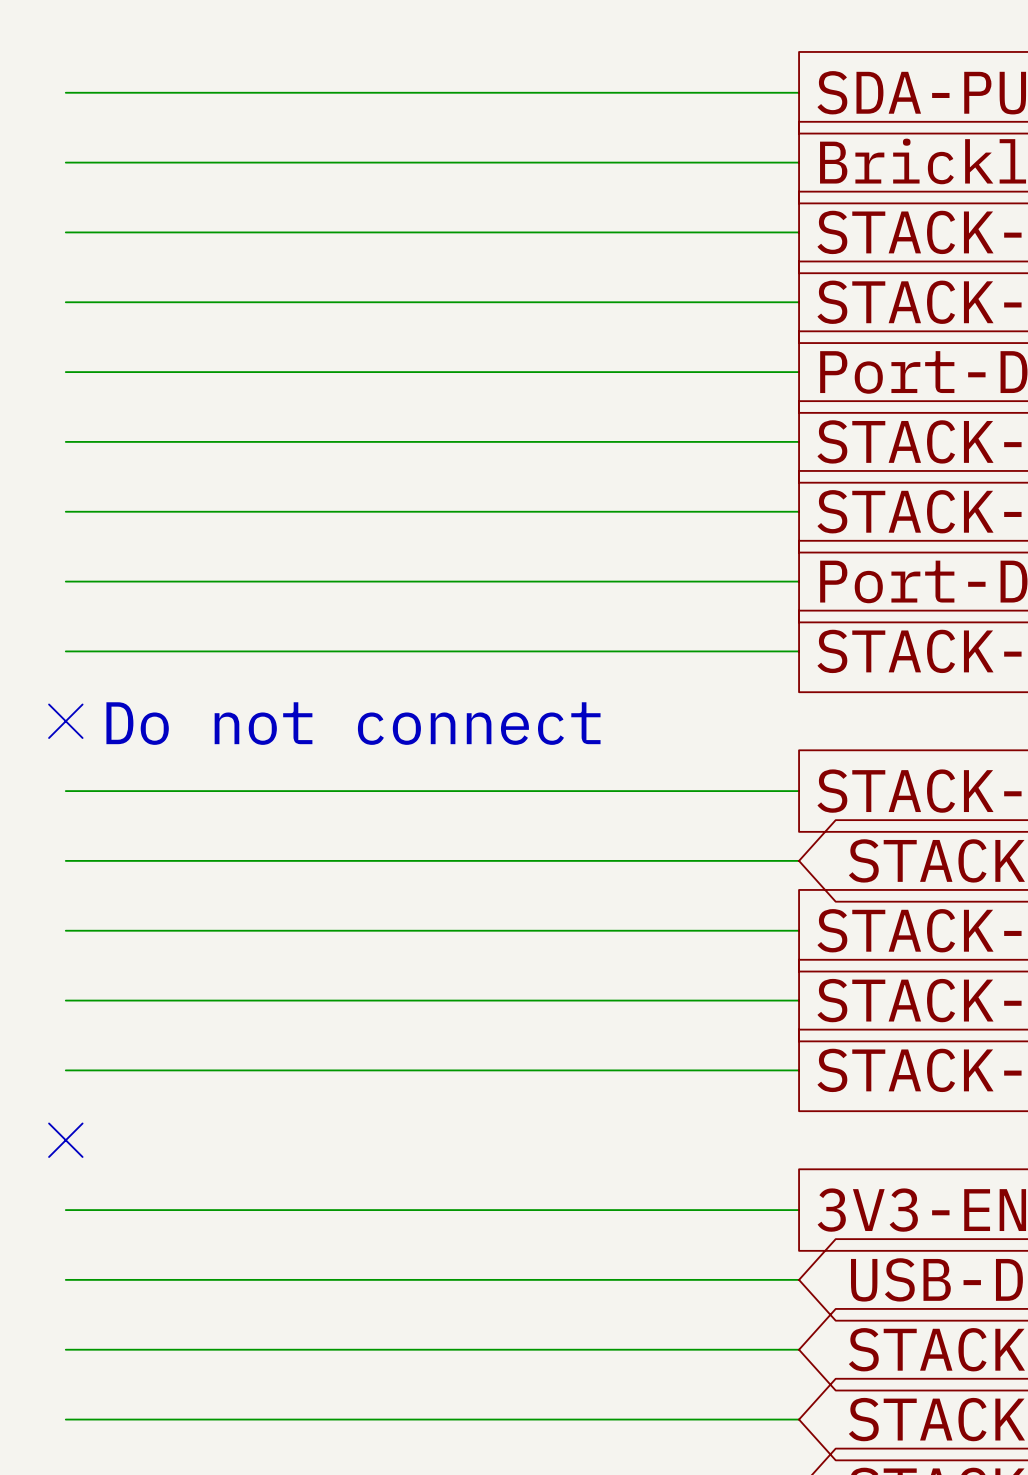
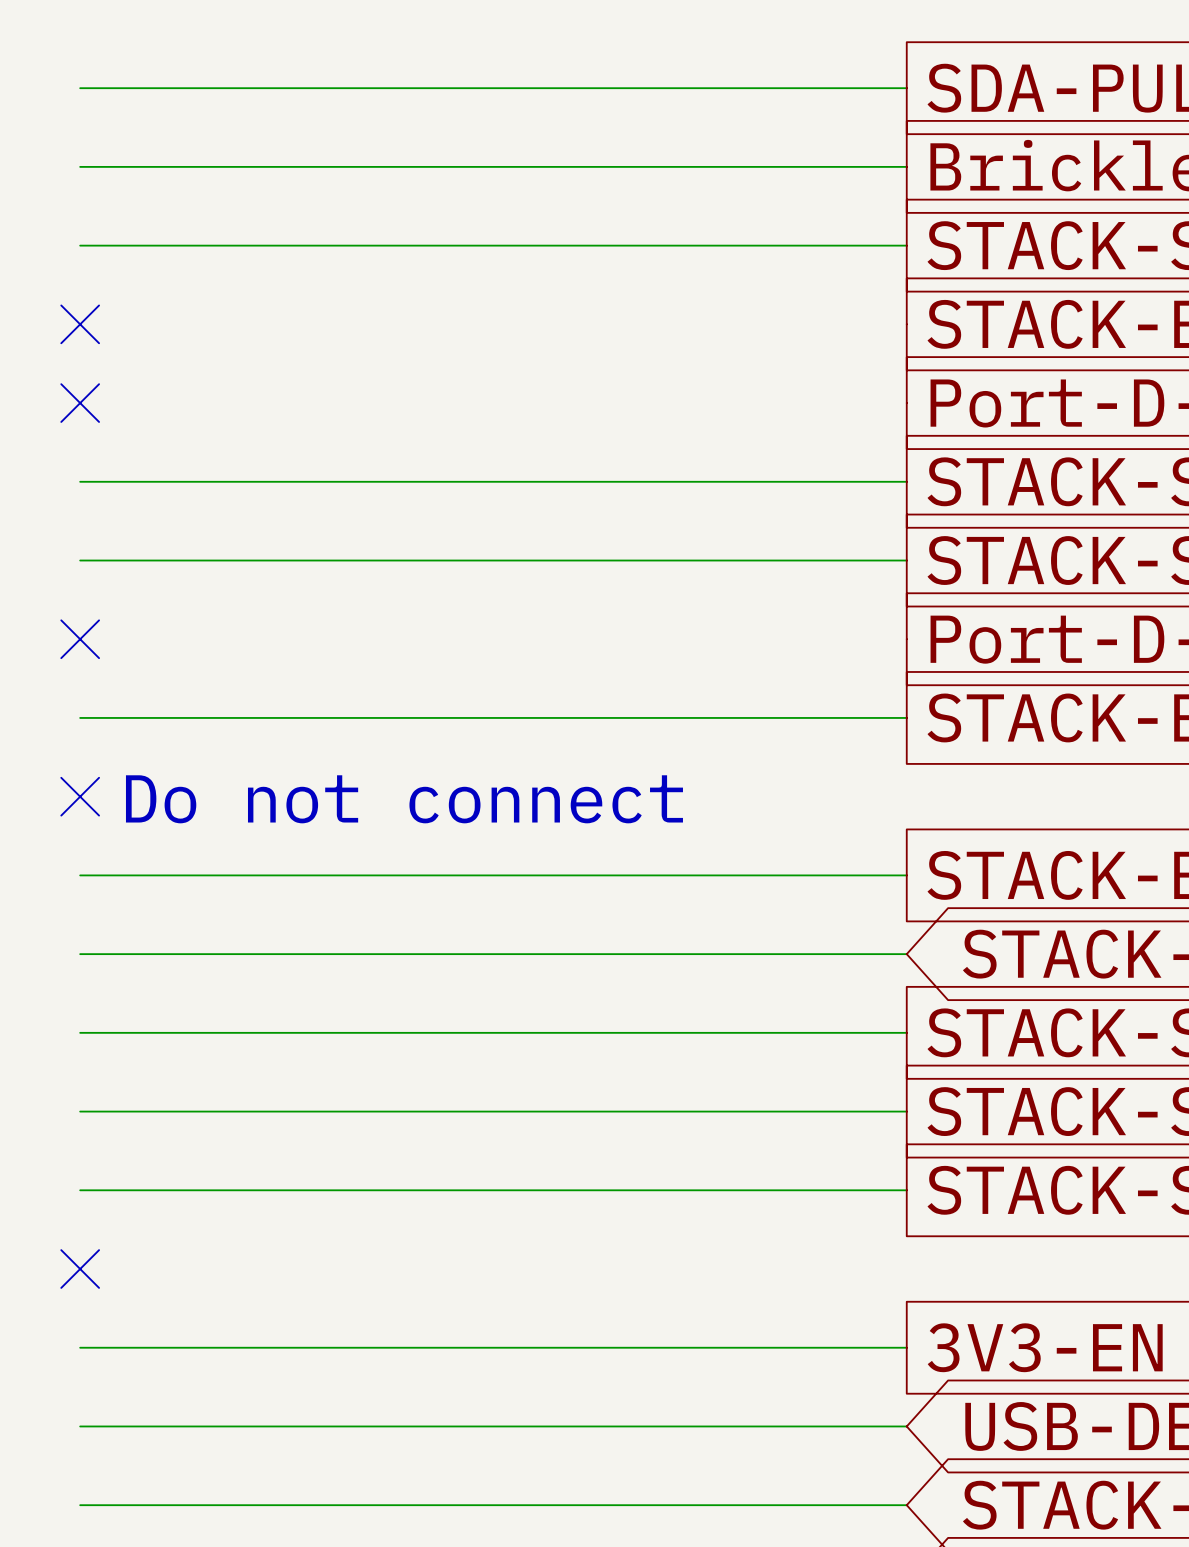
wire: (65, 302) (799, 302) -> none
no-connect mark: none -> (80, 324)
wire: (65, 372) (799, 372) -> none
no-connect mark: none -> (80, 403)
wire: (65, 581) (799, 581) -> none
no-connect mark: none -> (80, 639)

